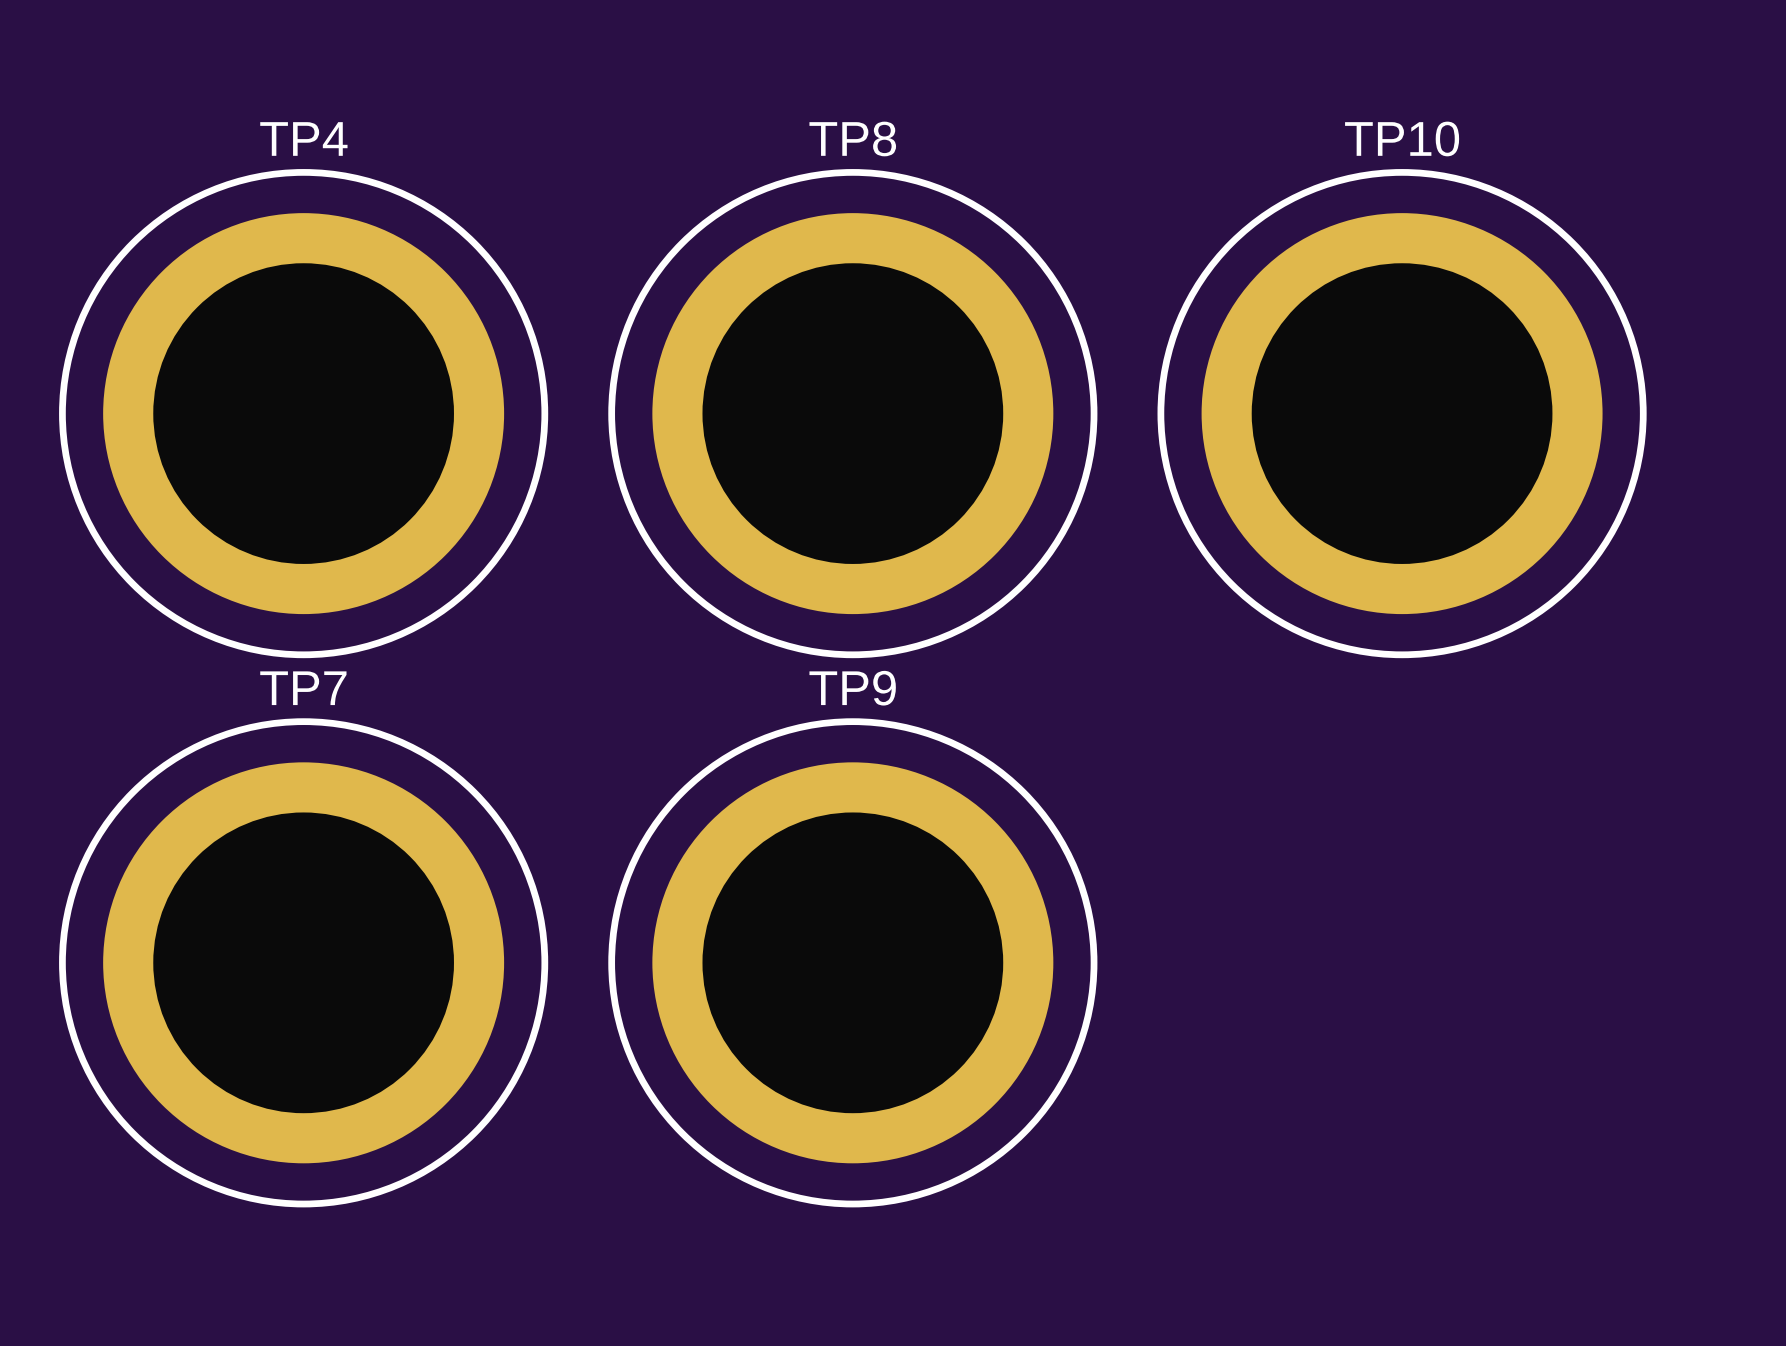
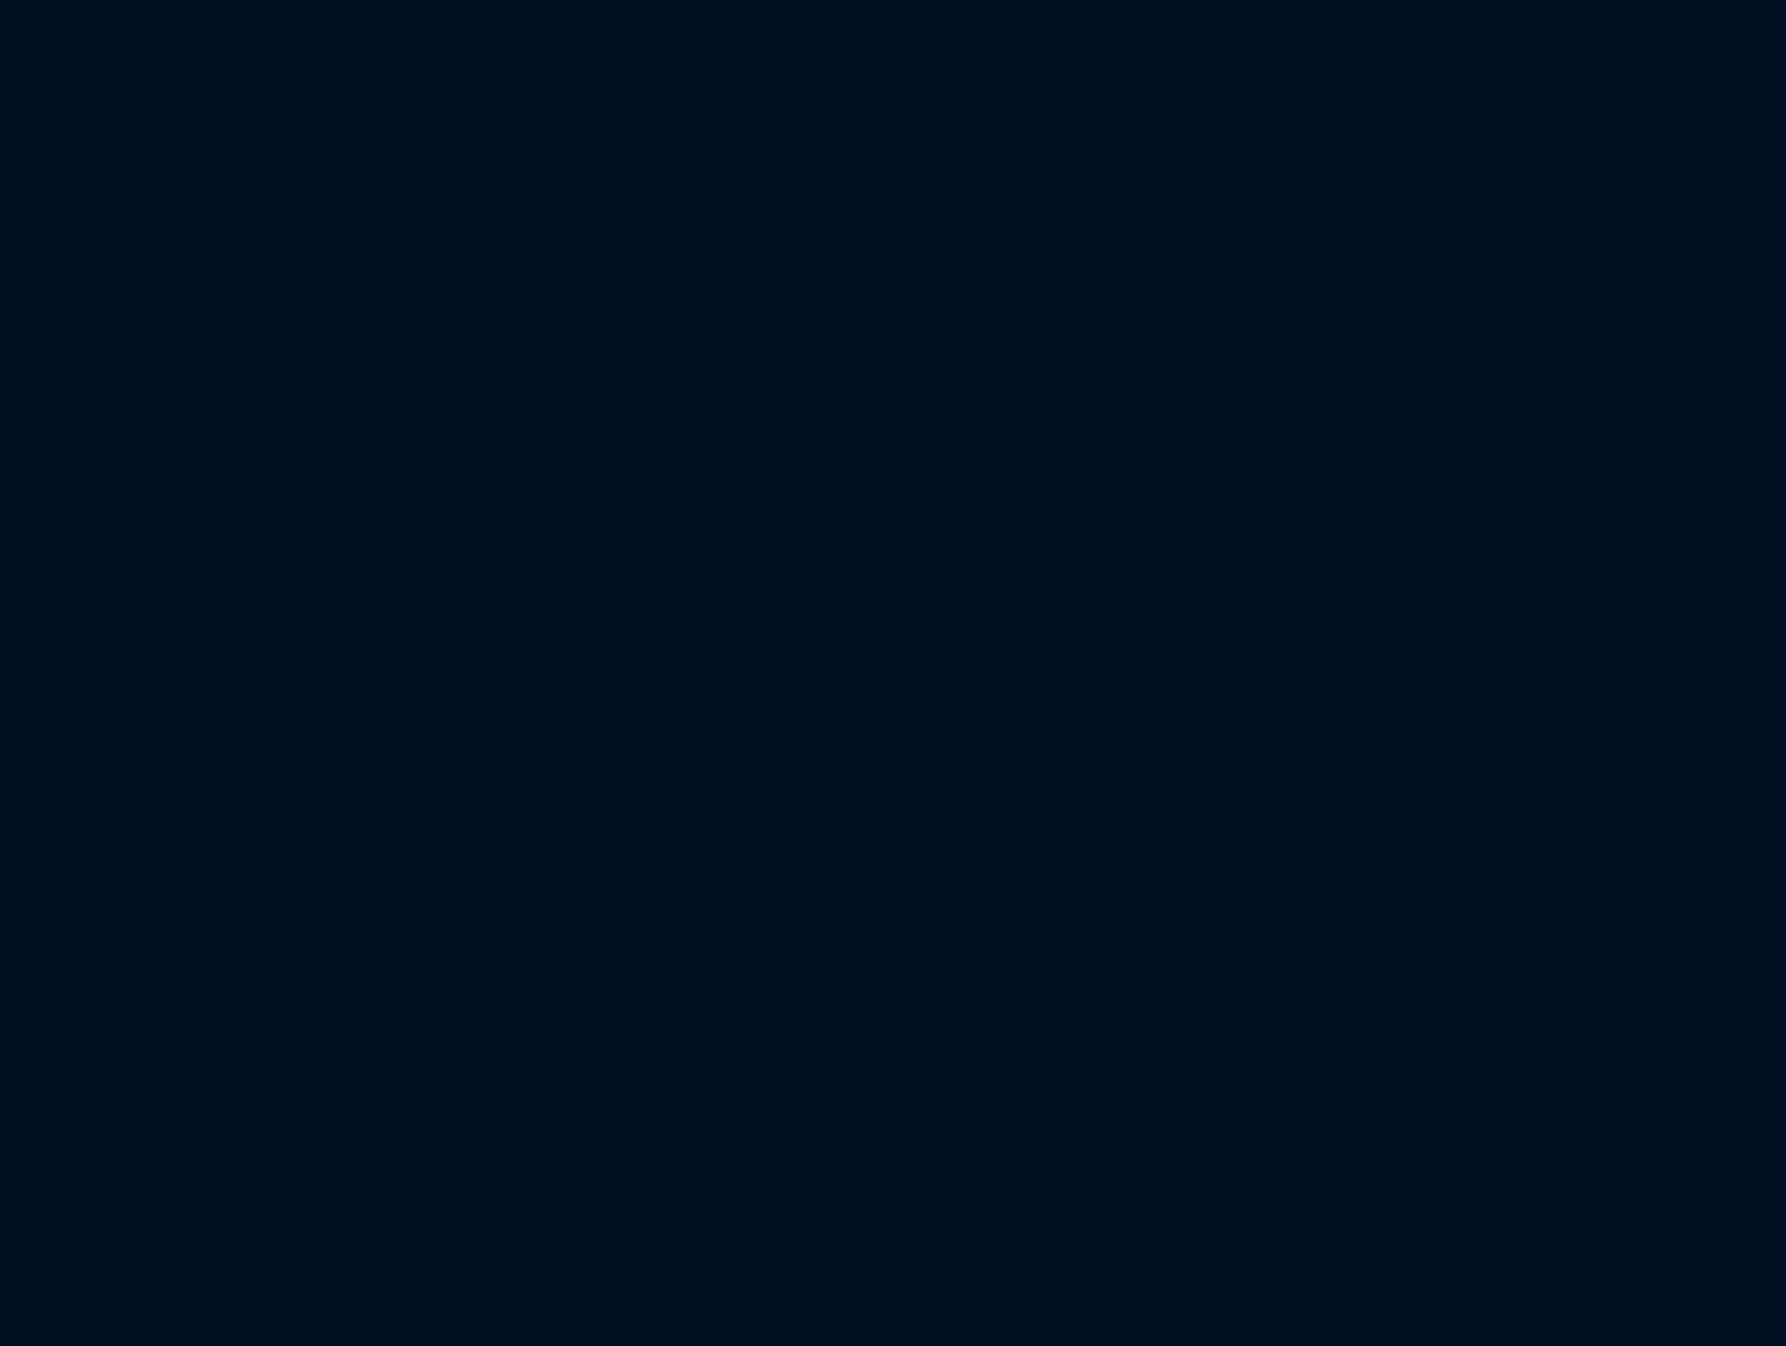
TP4: (303, 413) -> none
TP8: (852, 413) -> none
TP10: (1402, 413) -> none
TP7: (303, 962) -> none
TP9: (852, 962) -> none

